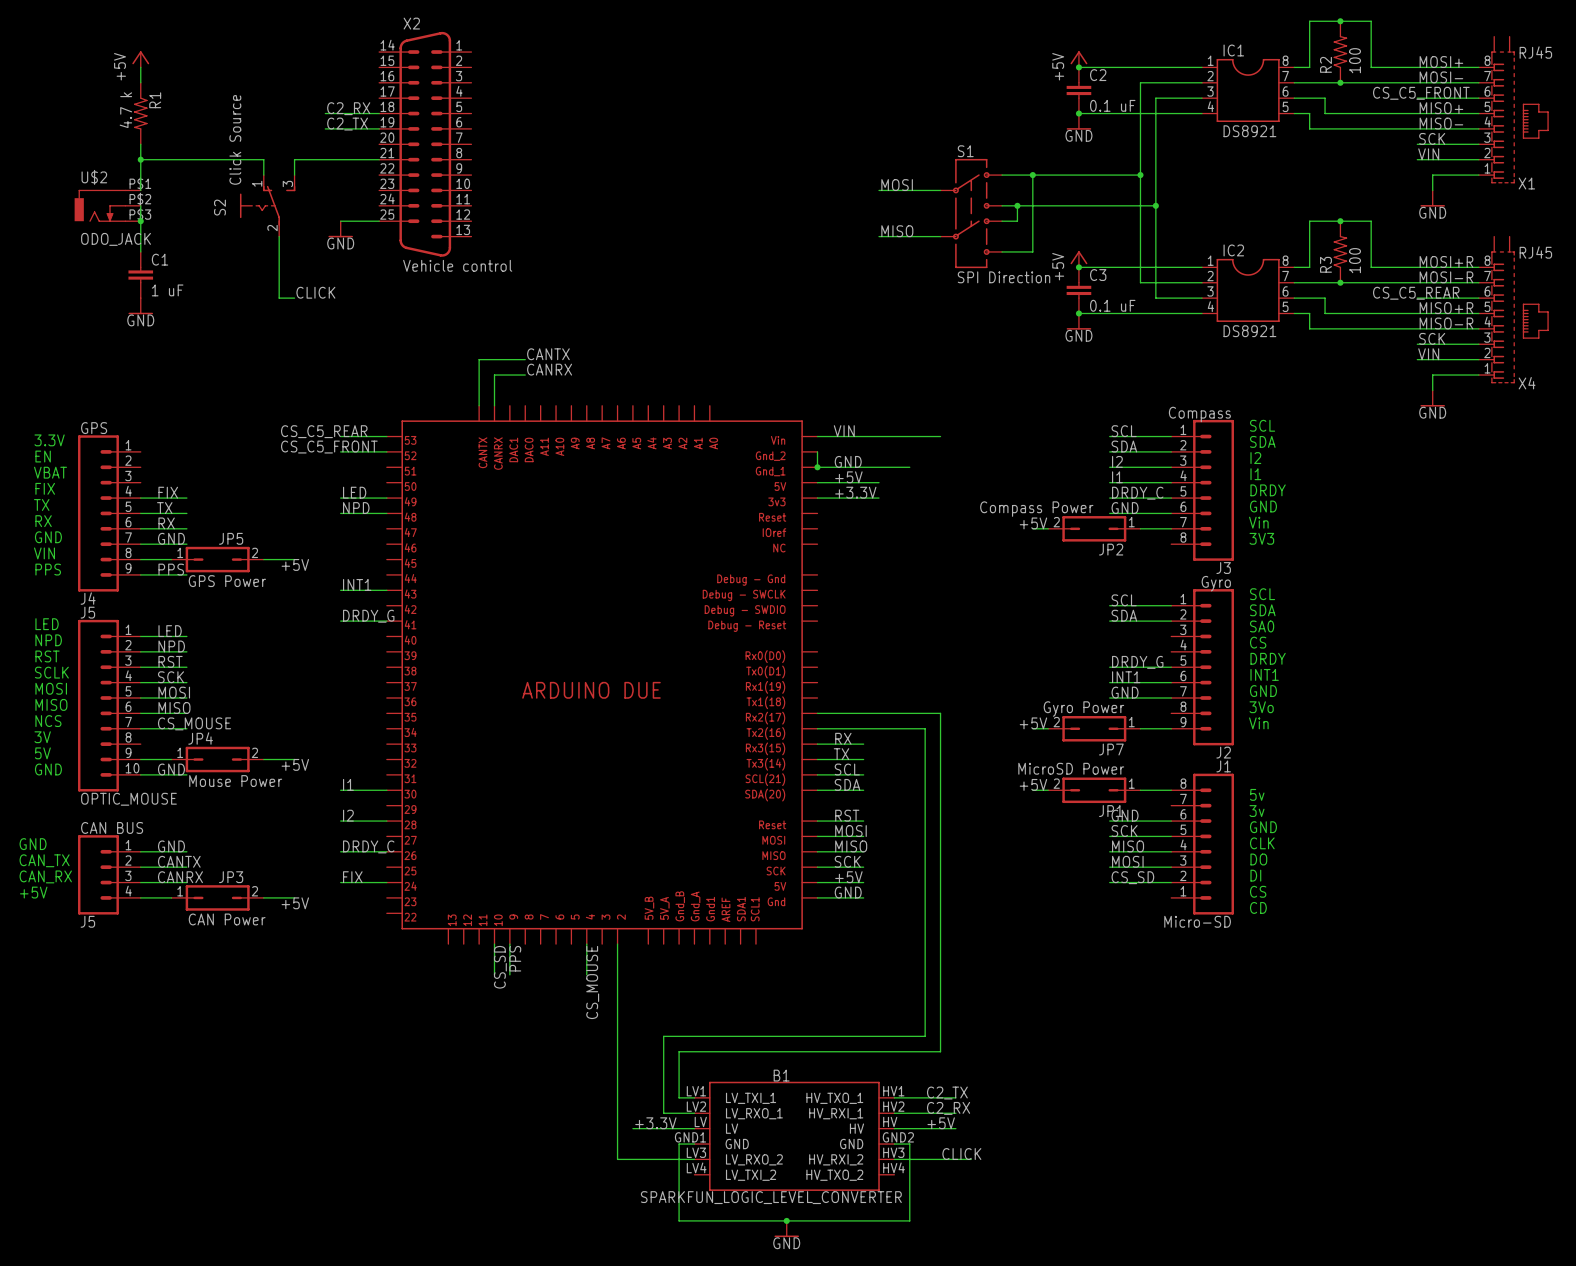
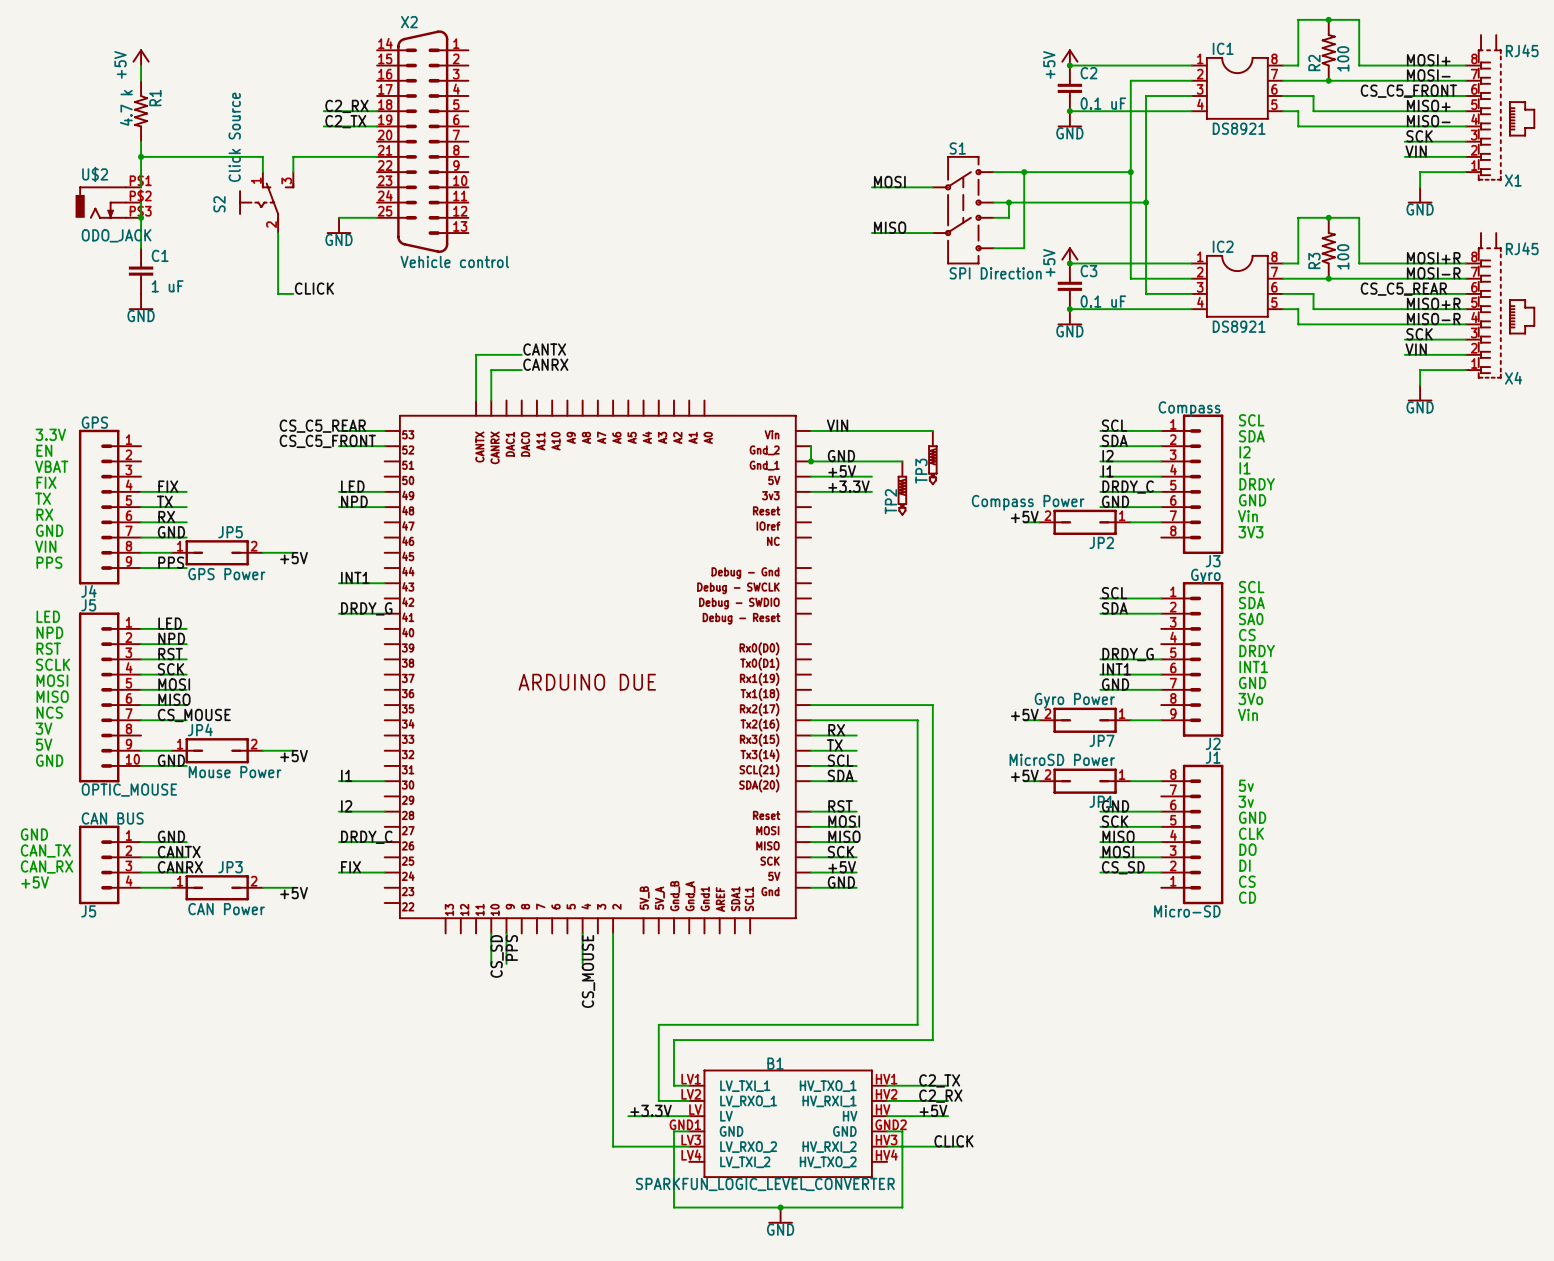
TP3: none -> (932, 457)
TP2: none -> (902, 488)

